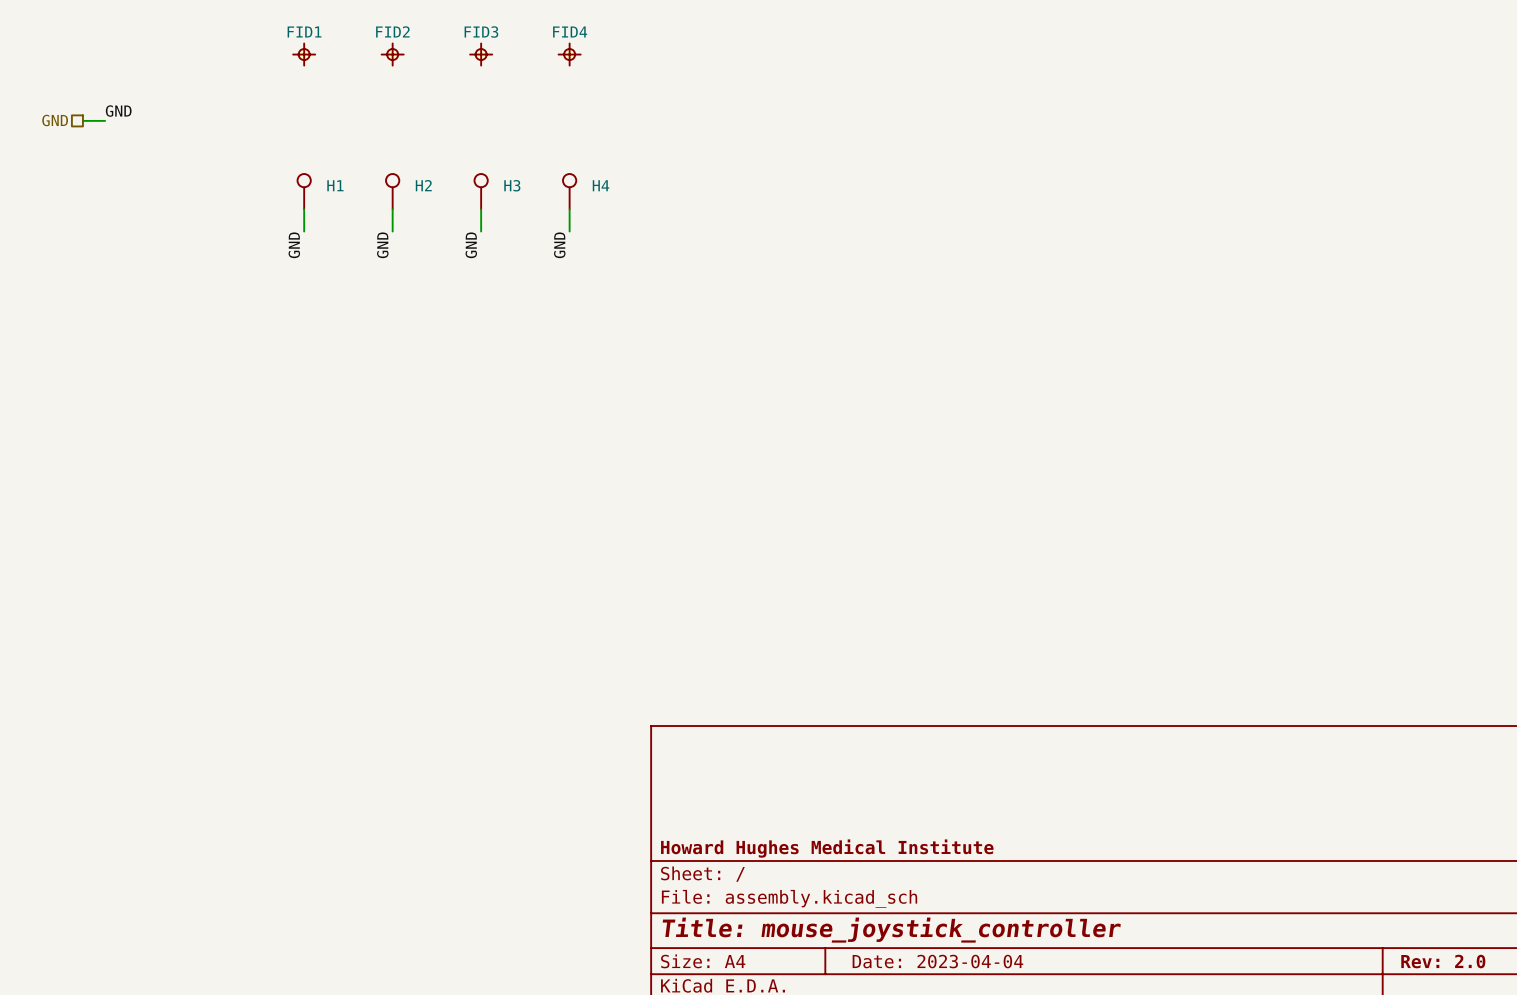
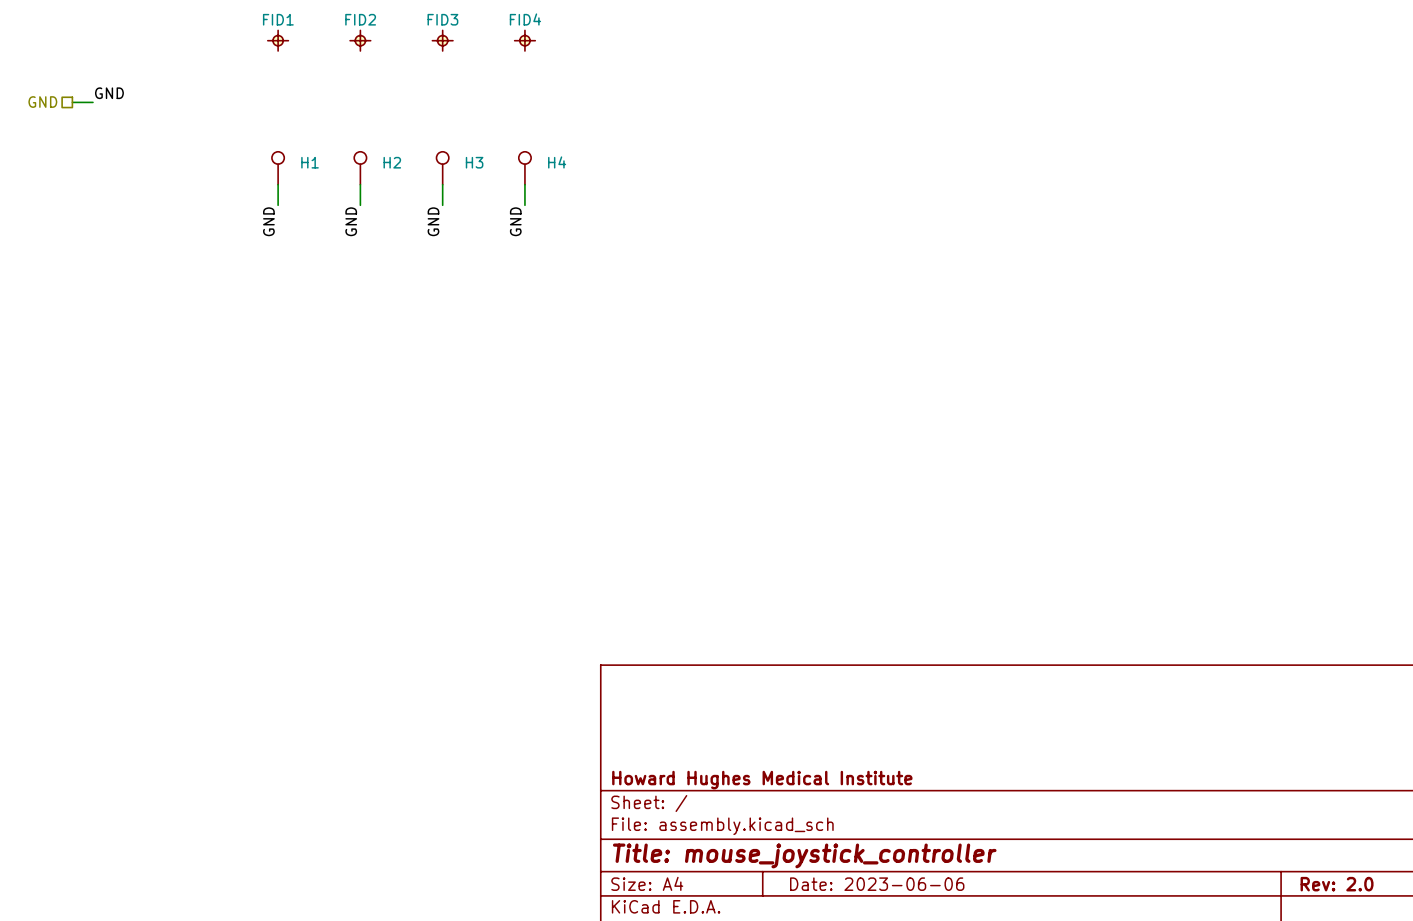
title block: Date: 2023-04-04 (937, 961) -> Date: 2023-06-06 (877, 884)

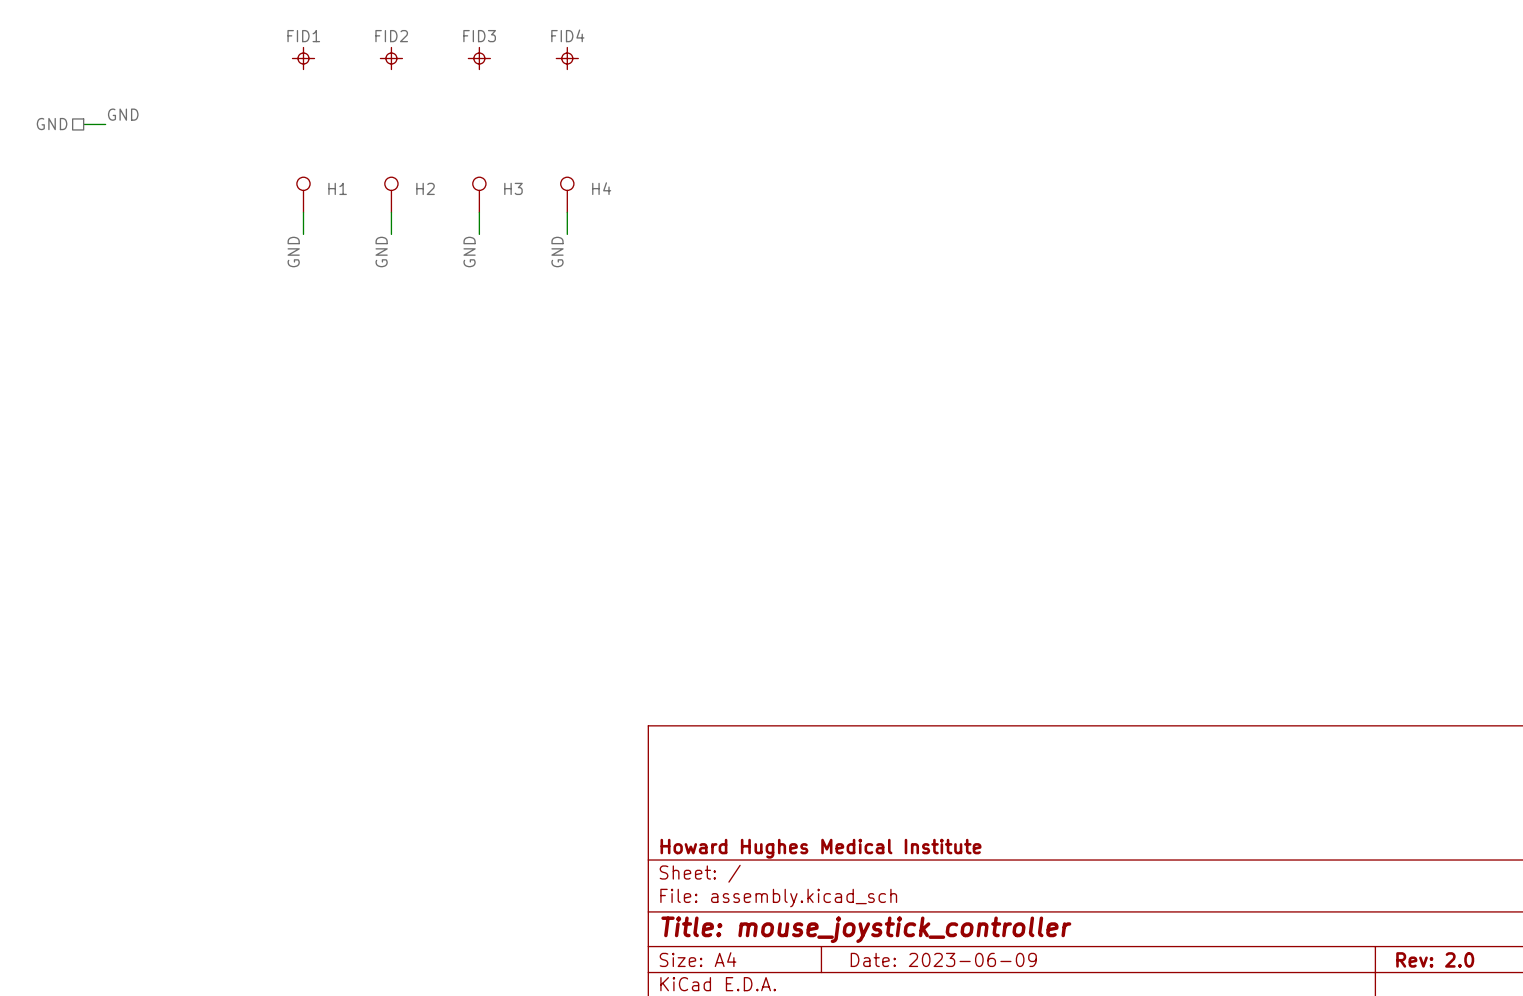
title block: Date: 2023-06-06 (877, 884) -> Date: 2023-06-09 (943, 959)

